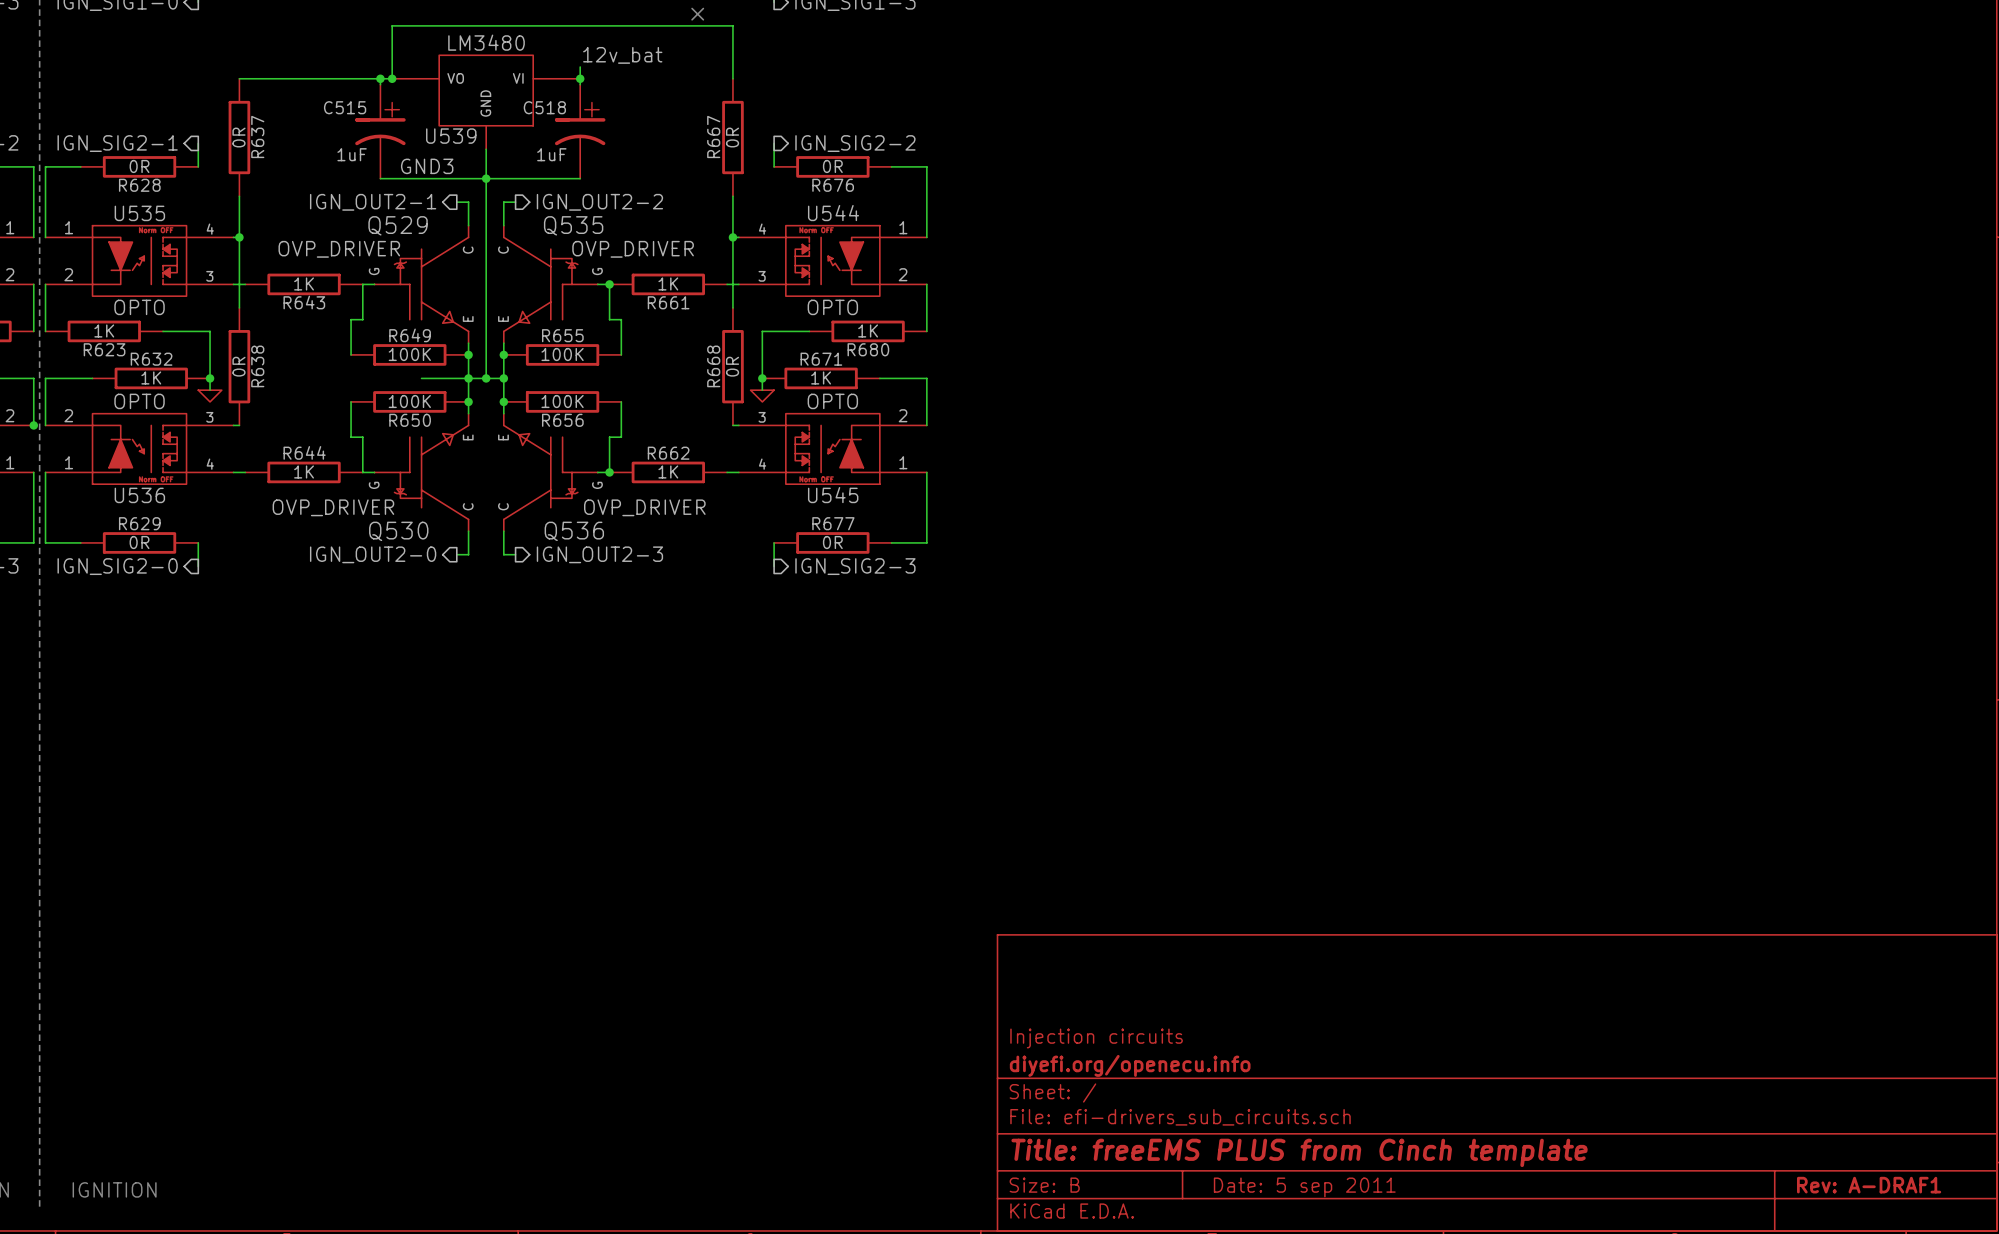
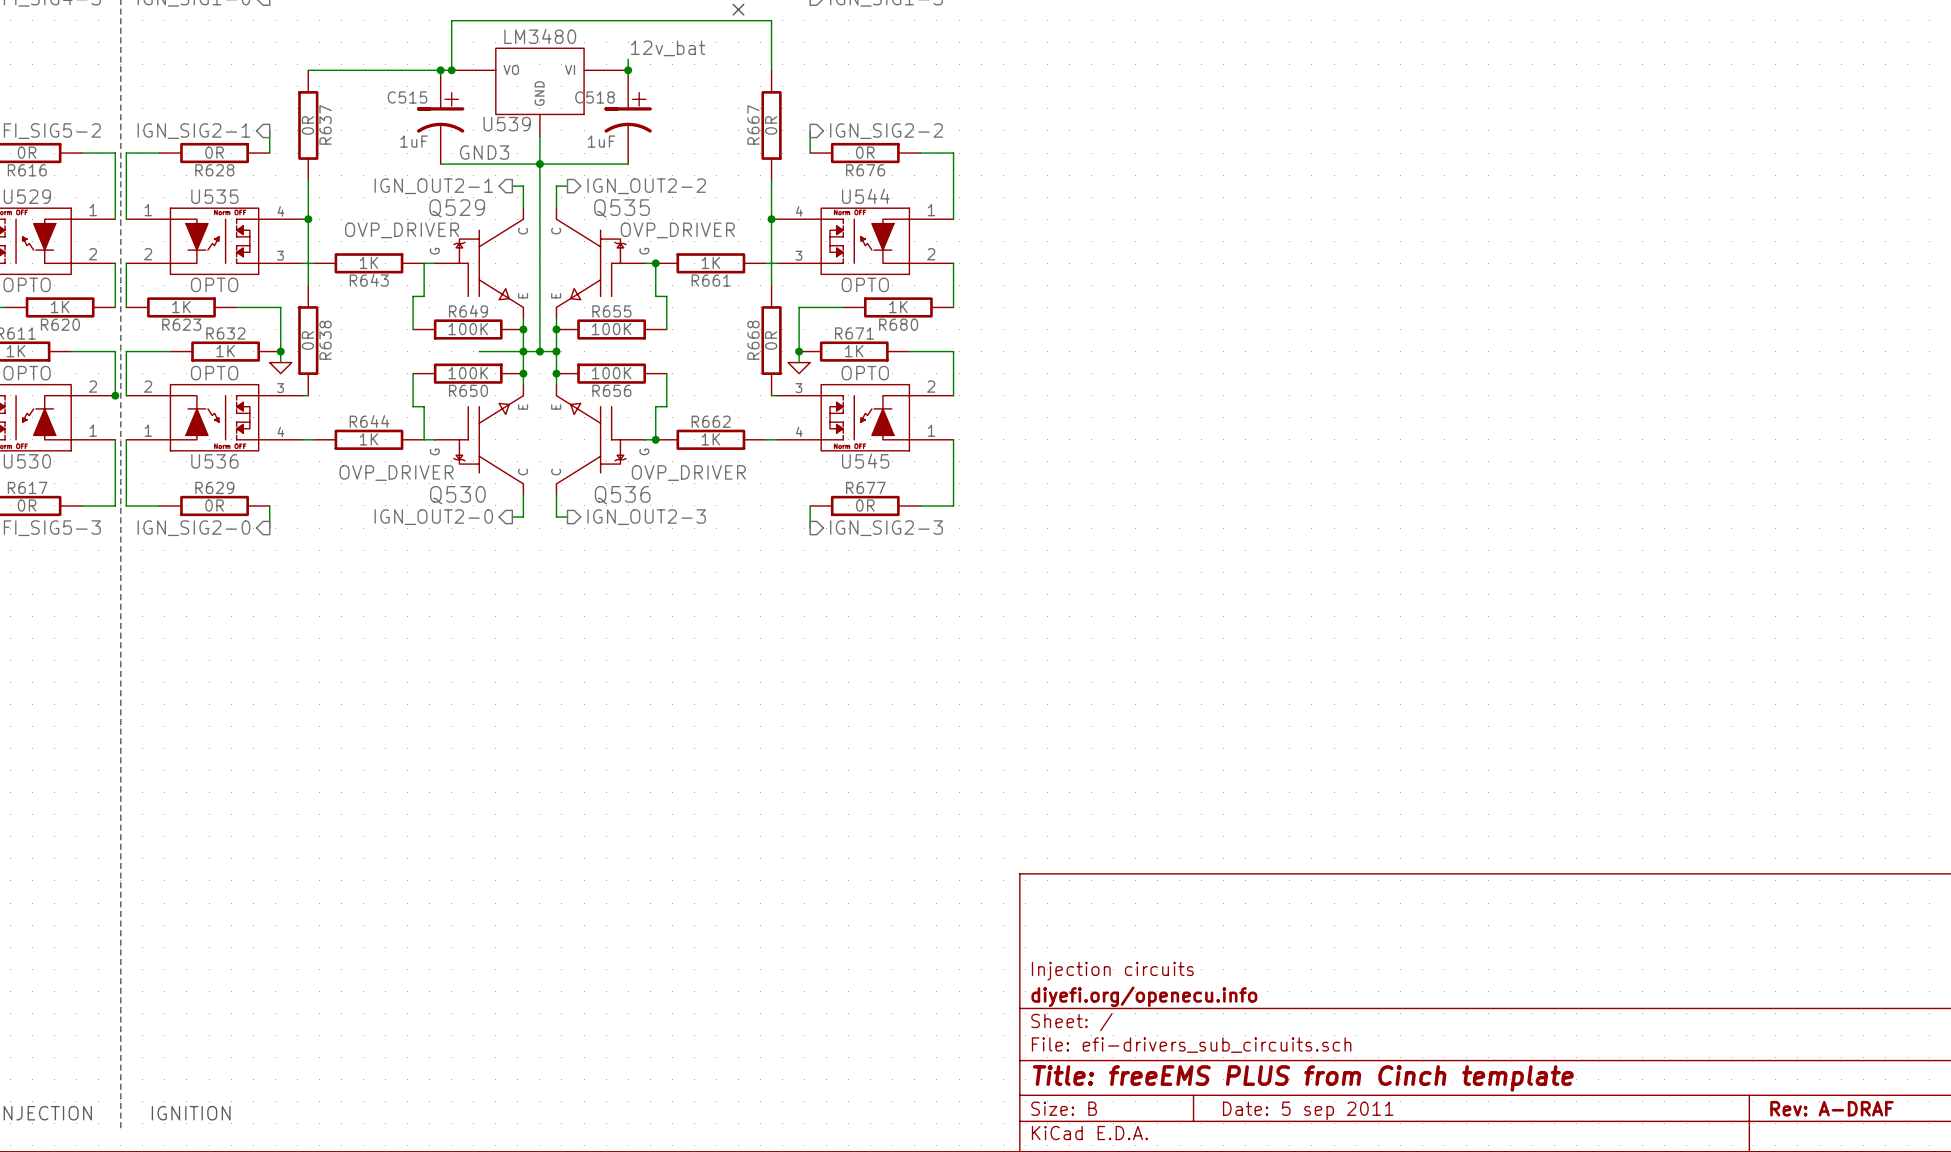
title block: Rev: A-DRAF1 (1869, 1185) -> Rev: A-DRAF (1832, 1108)

